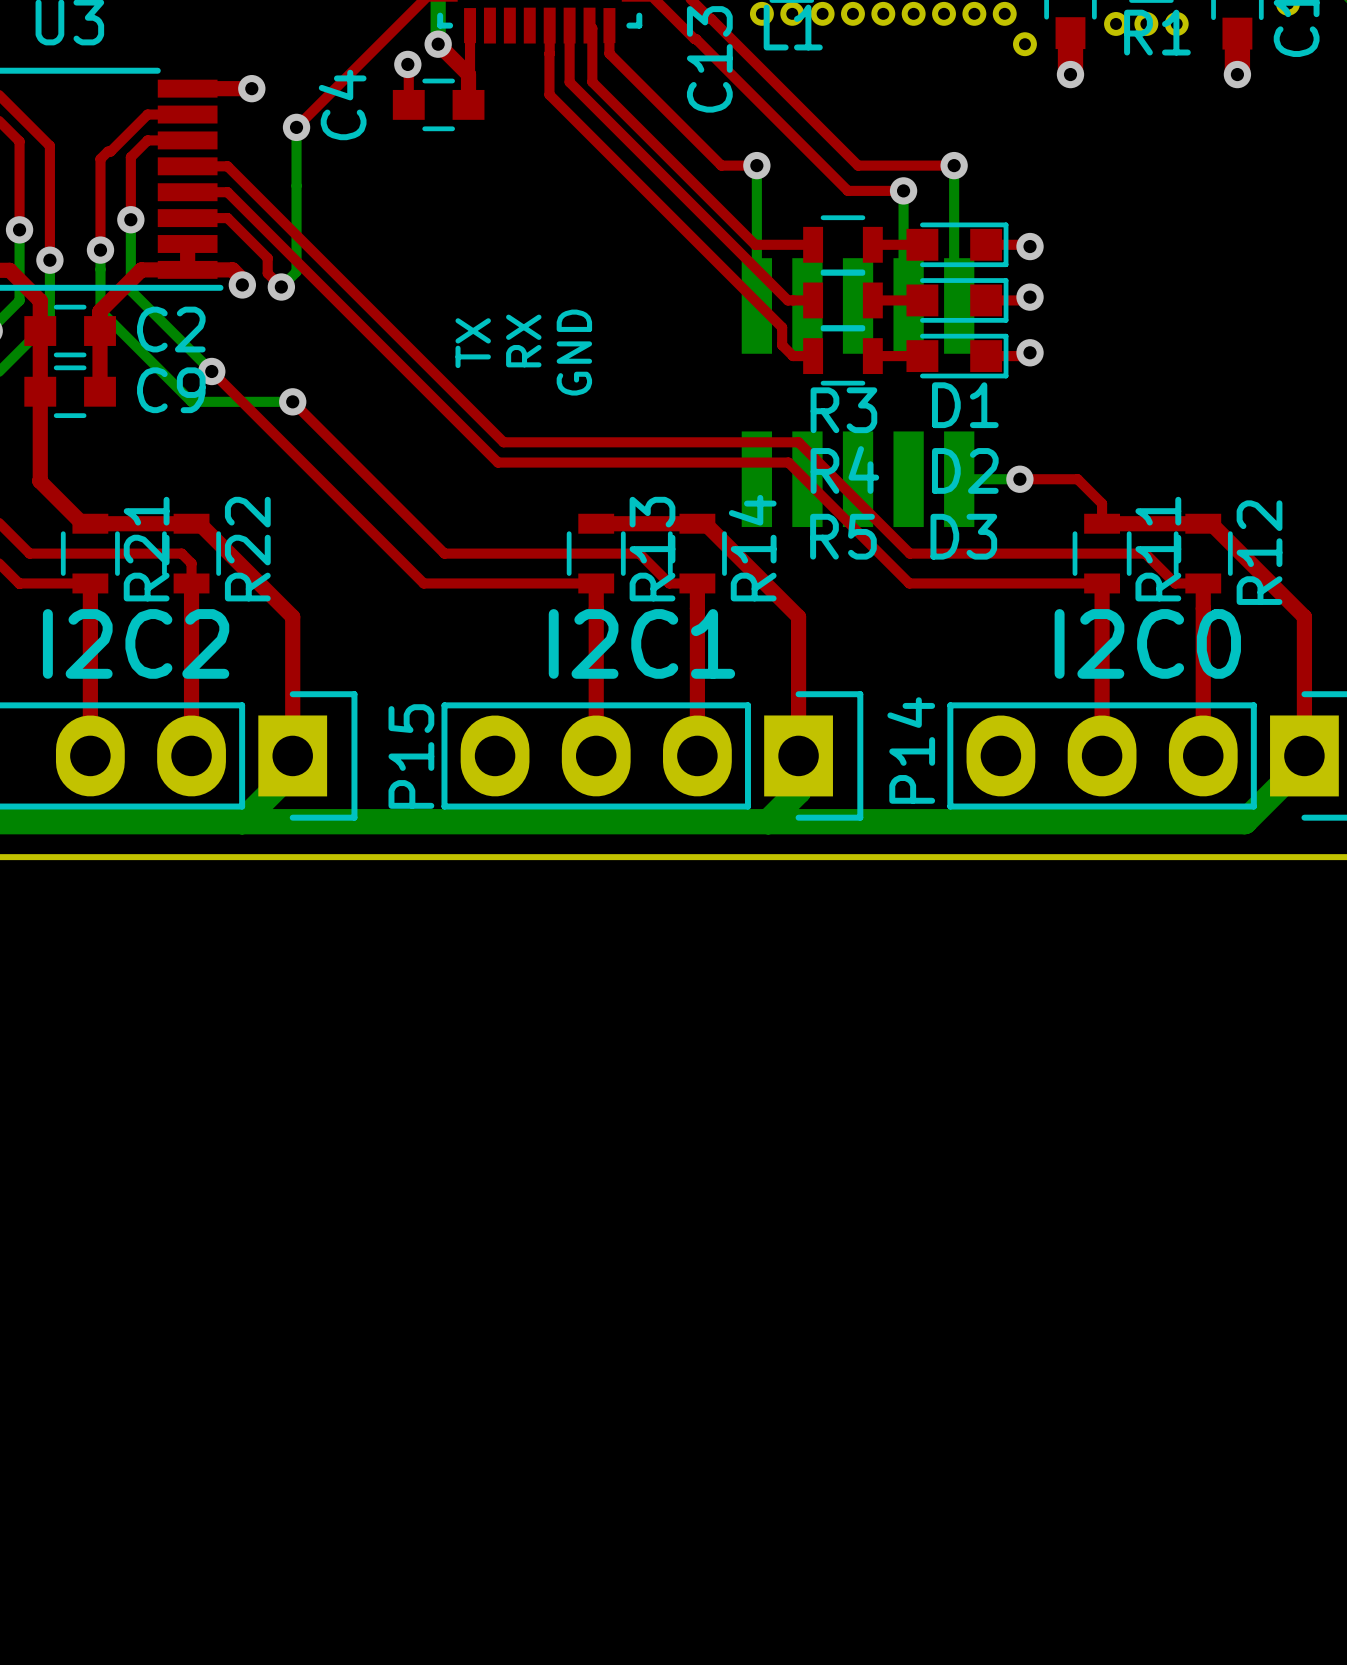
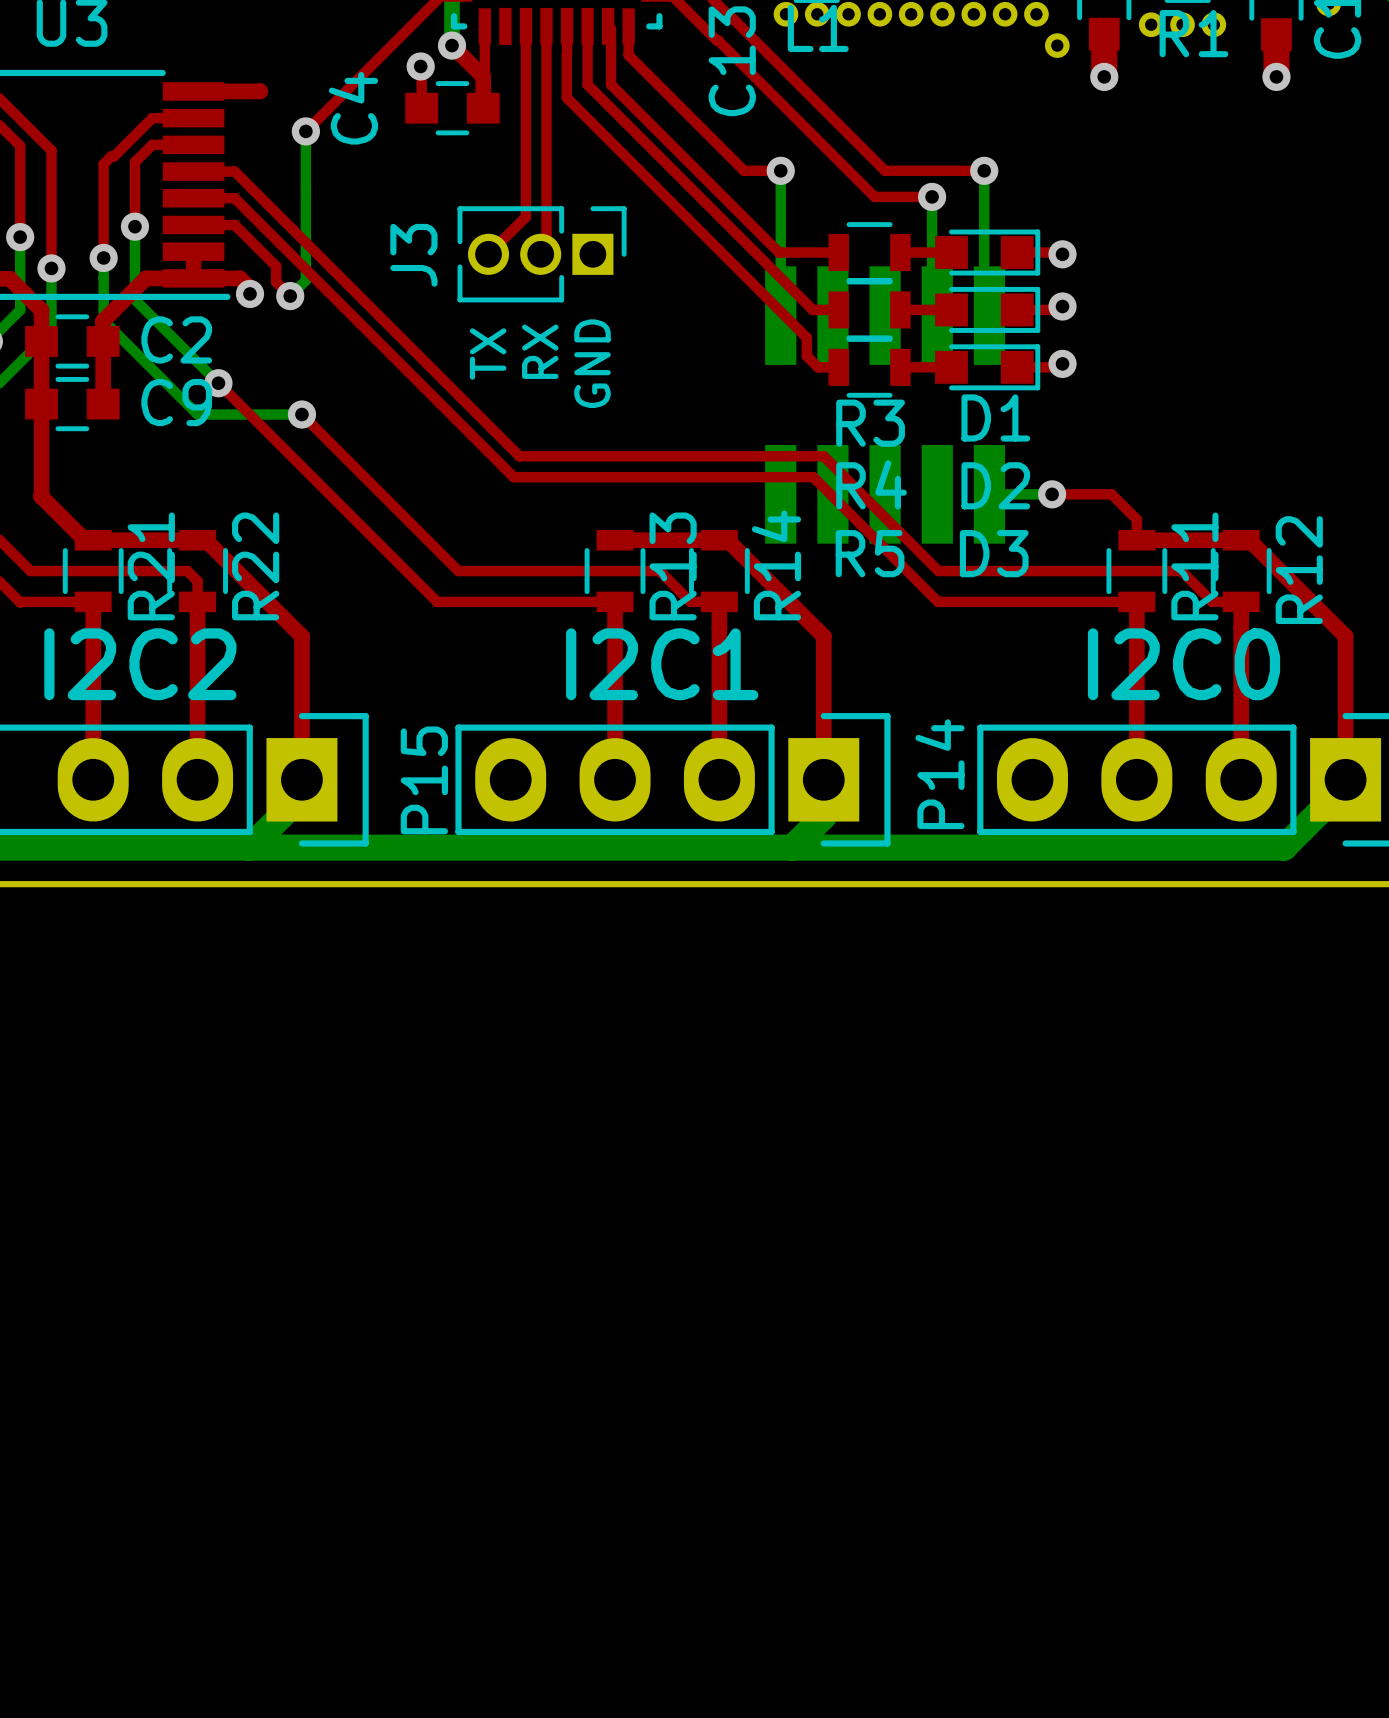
top track: none -> (525, 26) (525, 216) (488, 254)
top track: none -> (546, 26) (546, 248) (540, 254)
via: (251, 88) -> none
J3: none -> (542, 254)

